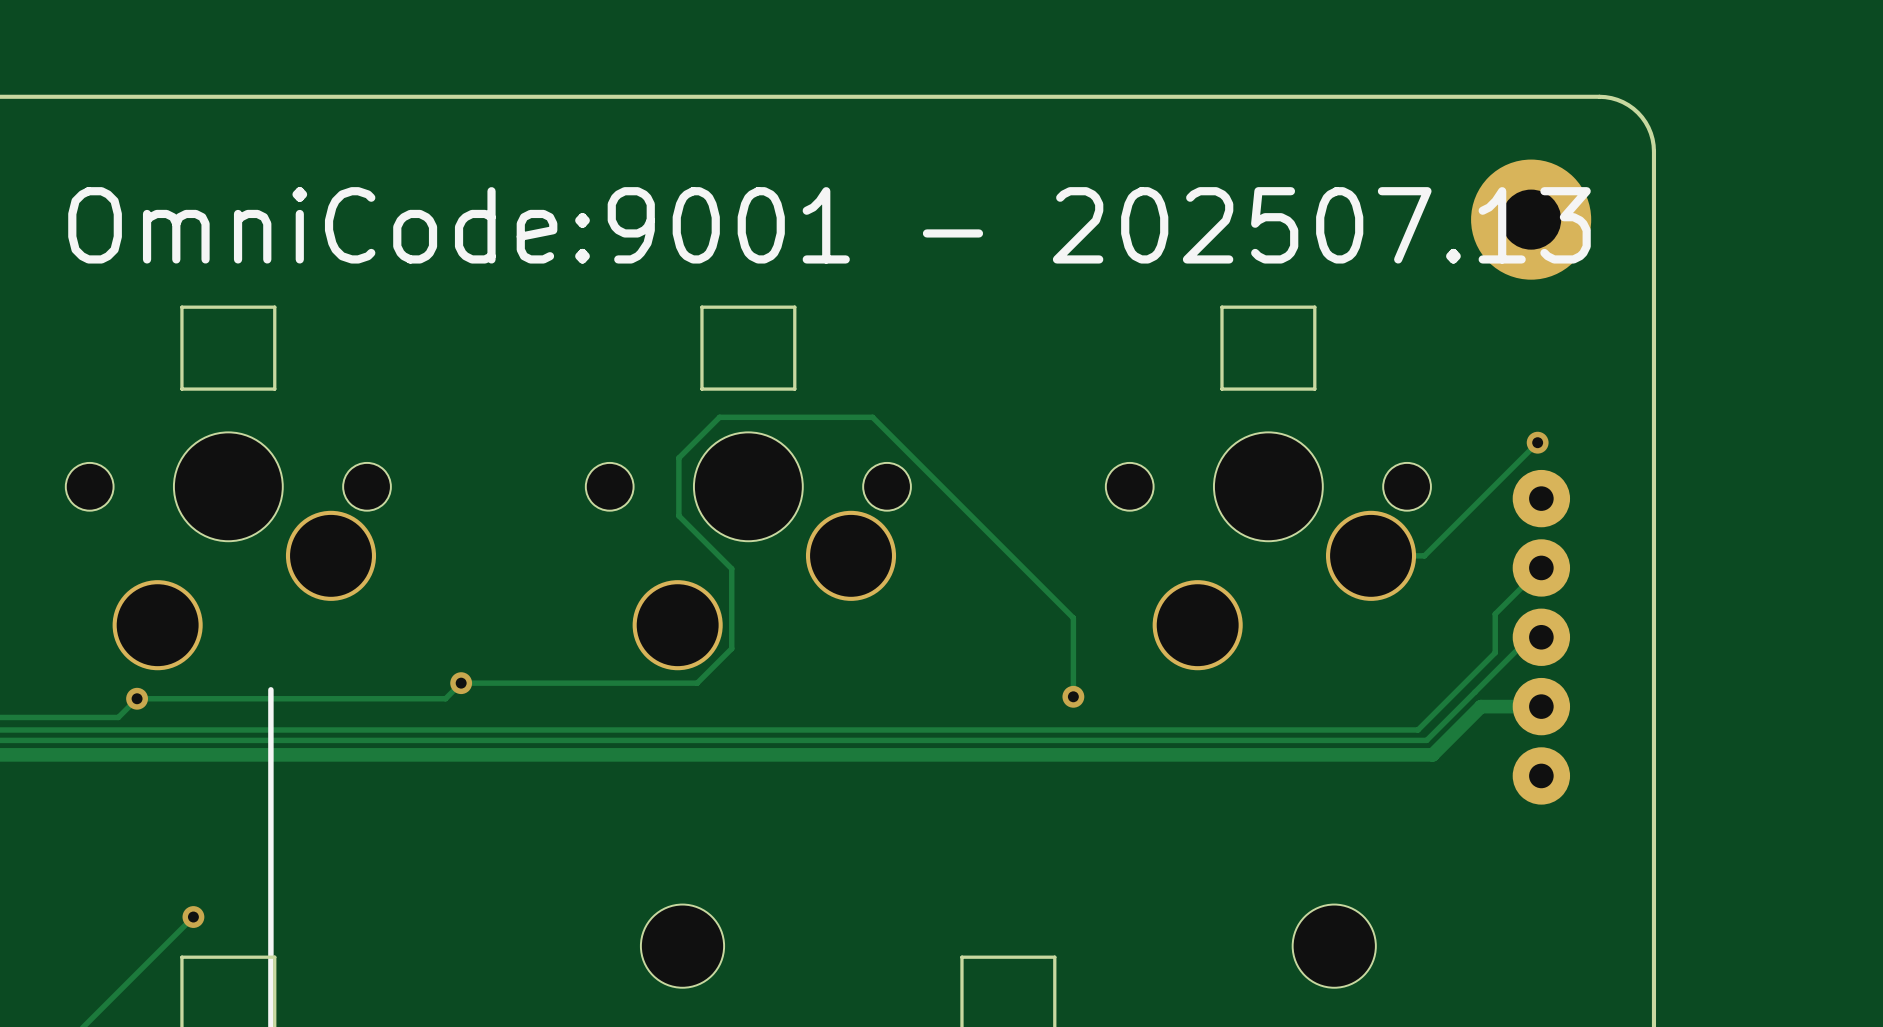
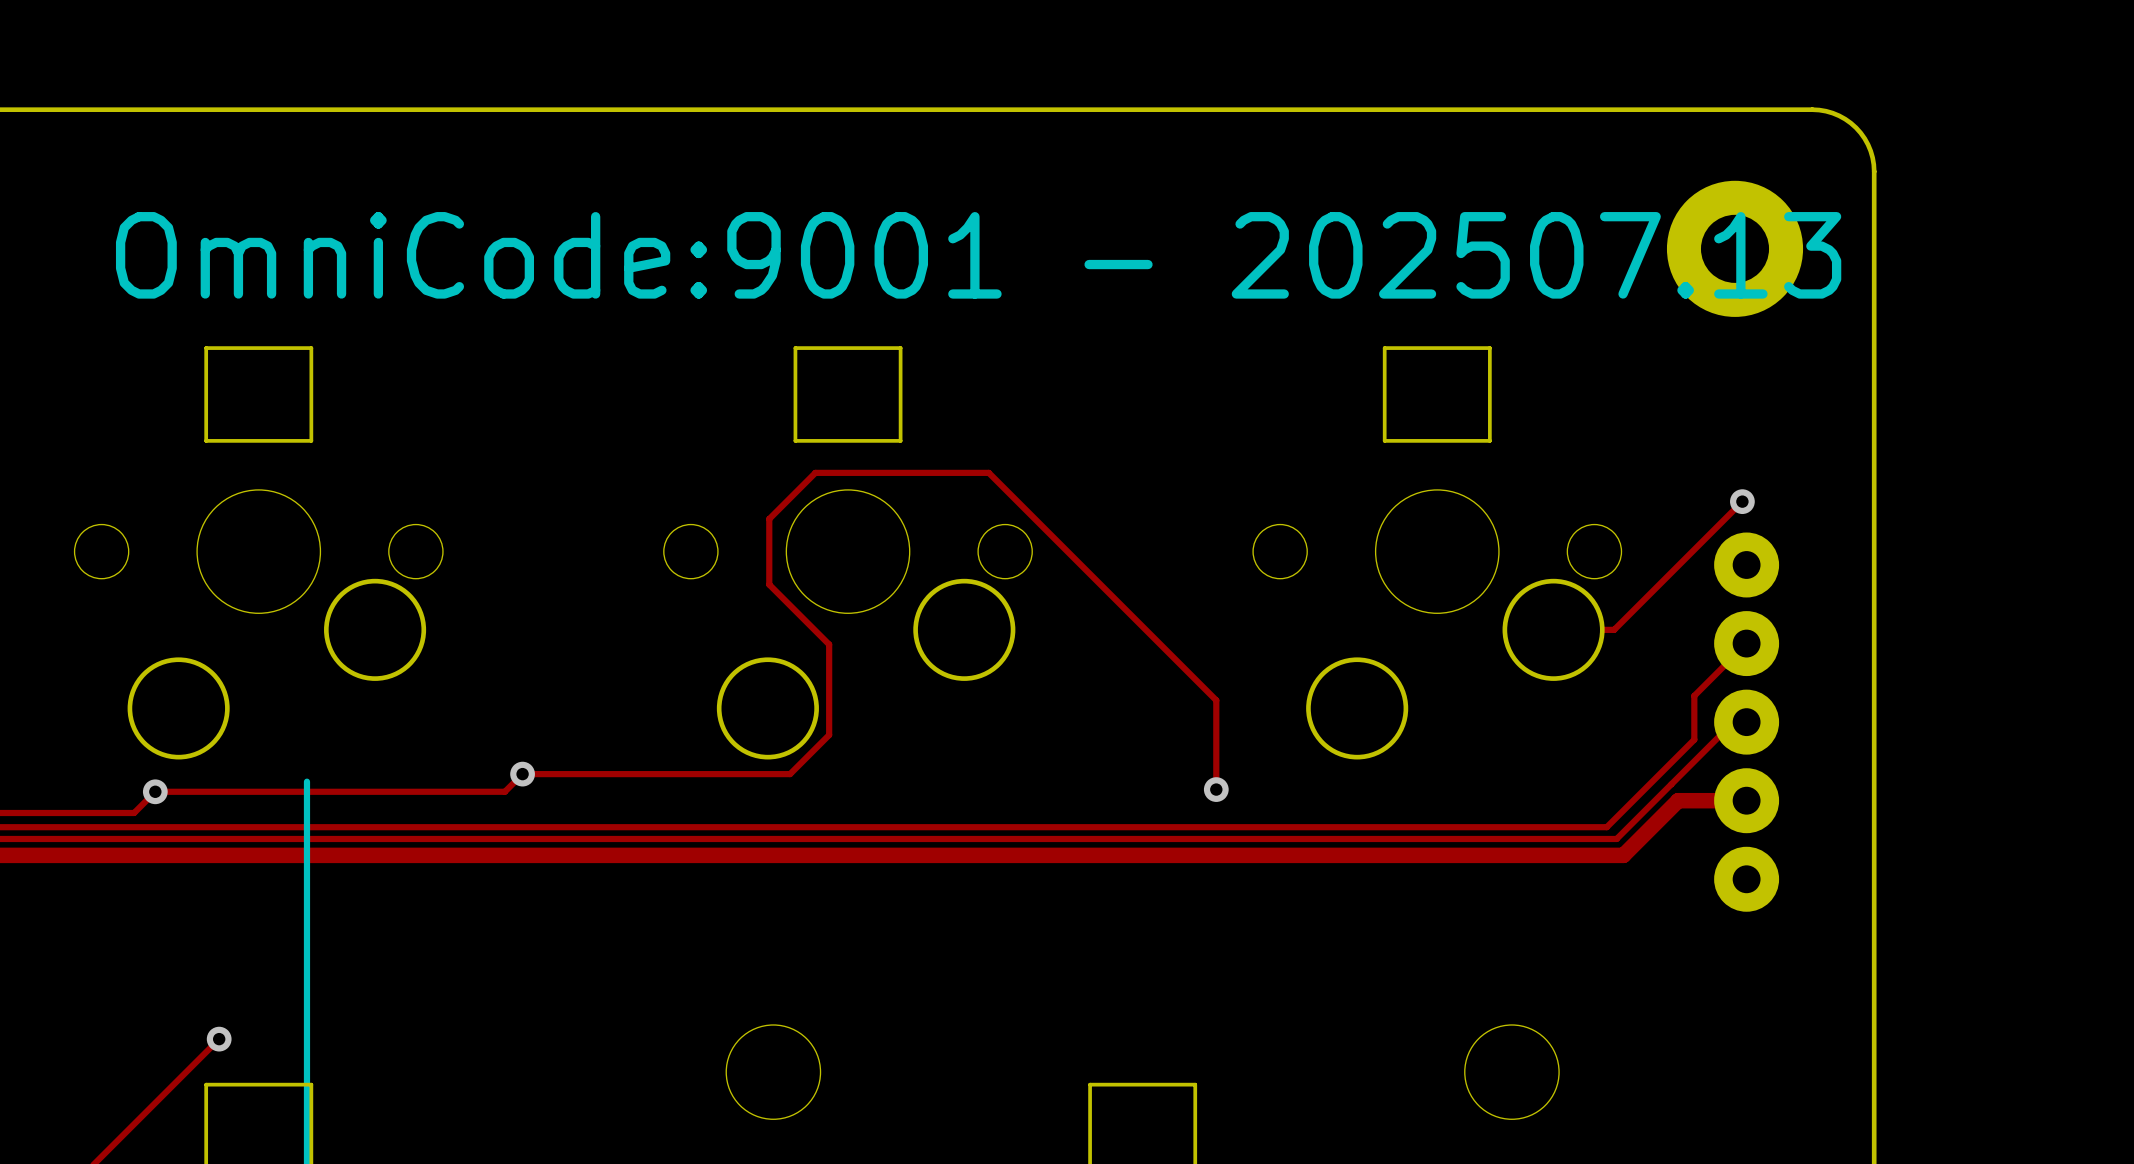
text position: OmniCode:9001 - 202507.13 (829, 225) -> OmniCode:9001 - 202507.13 (978, 255)

